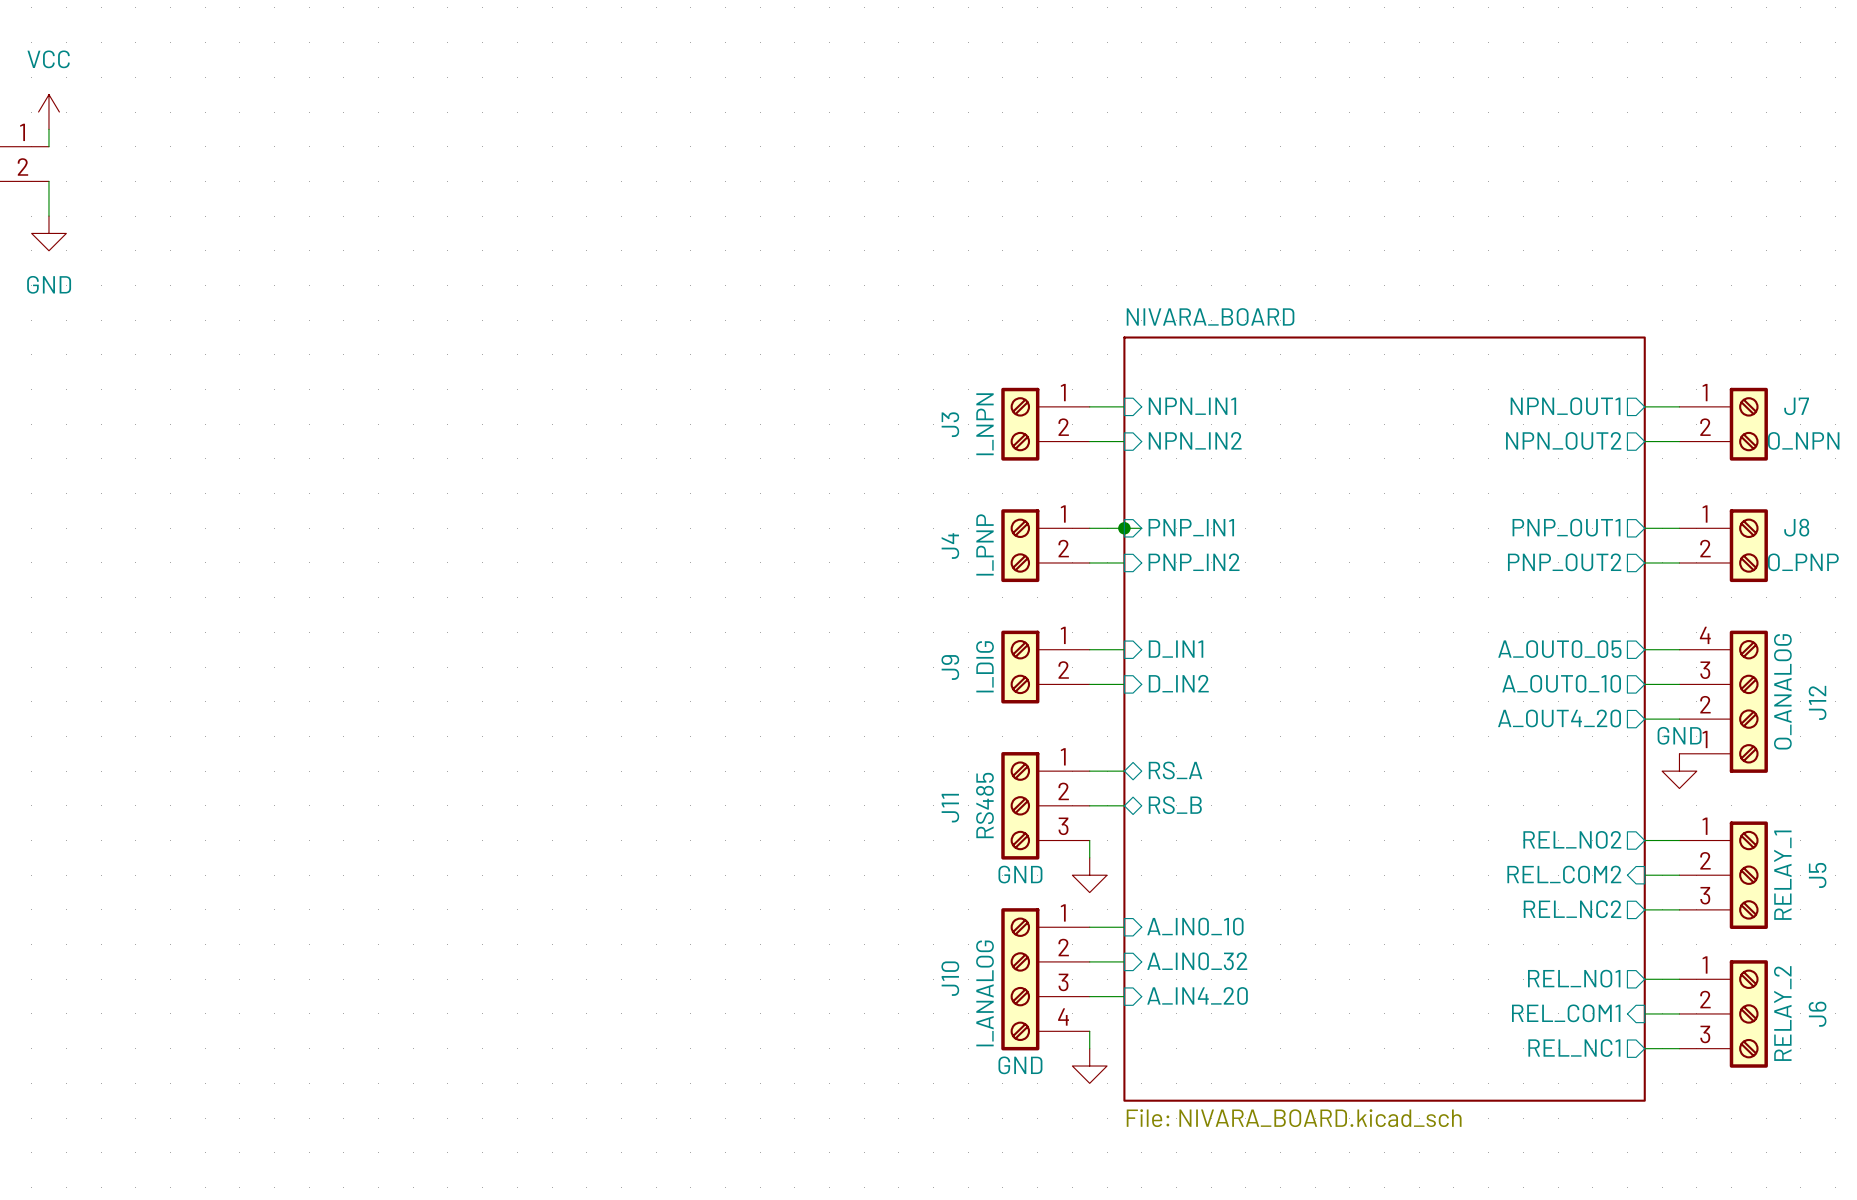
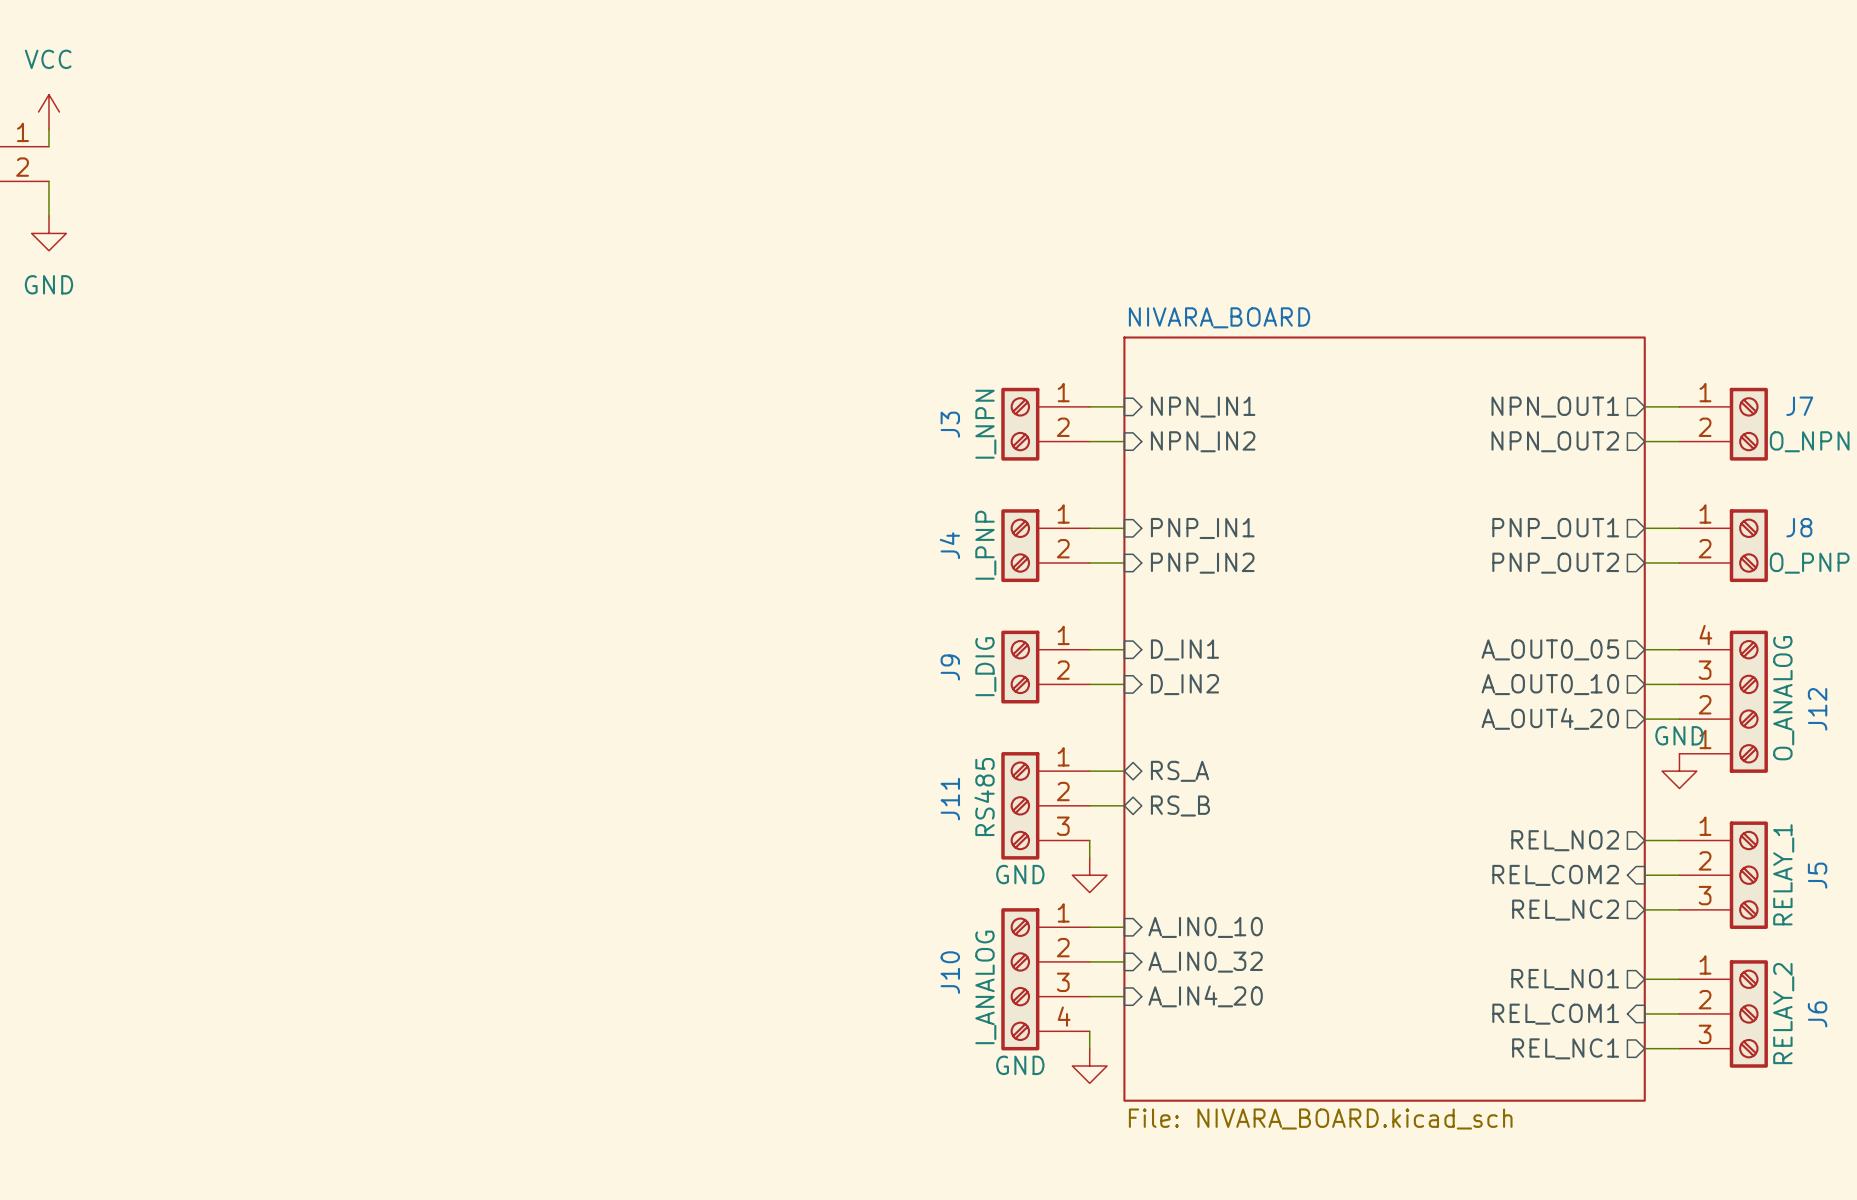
wire: (1124, 528) (1141, 528) -> none
junction: (1124, 528) -> none

